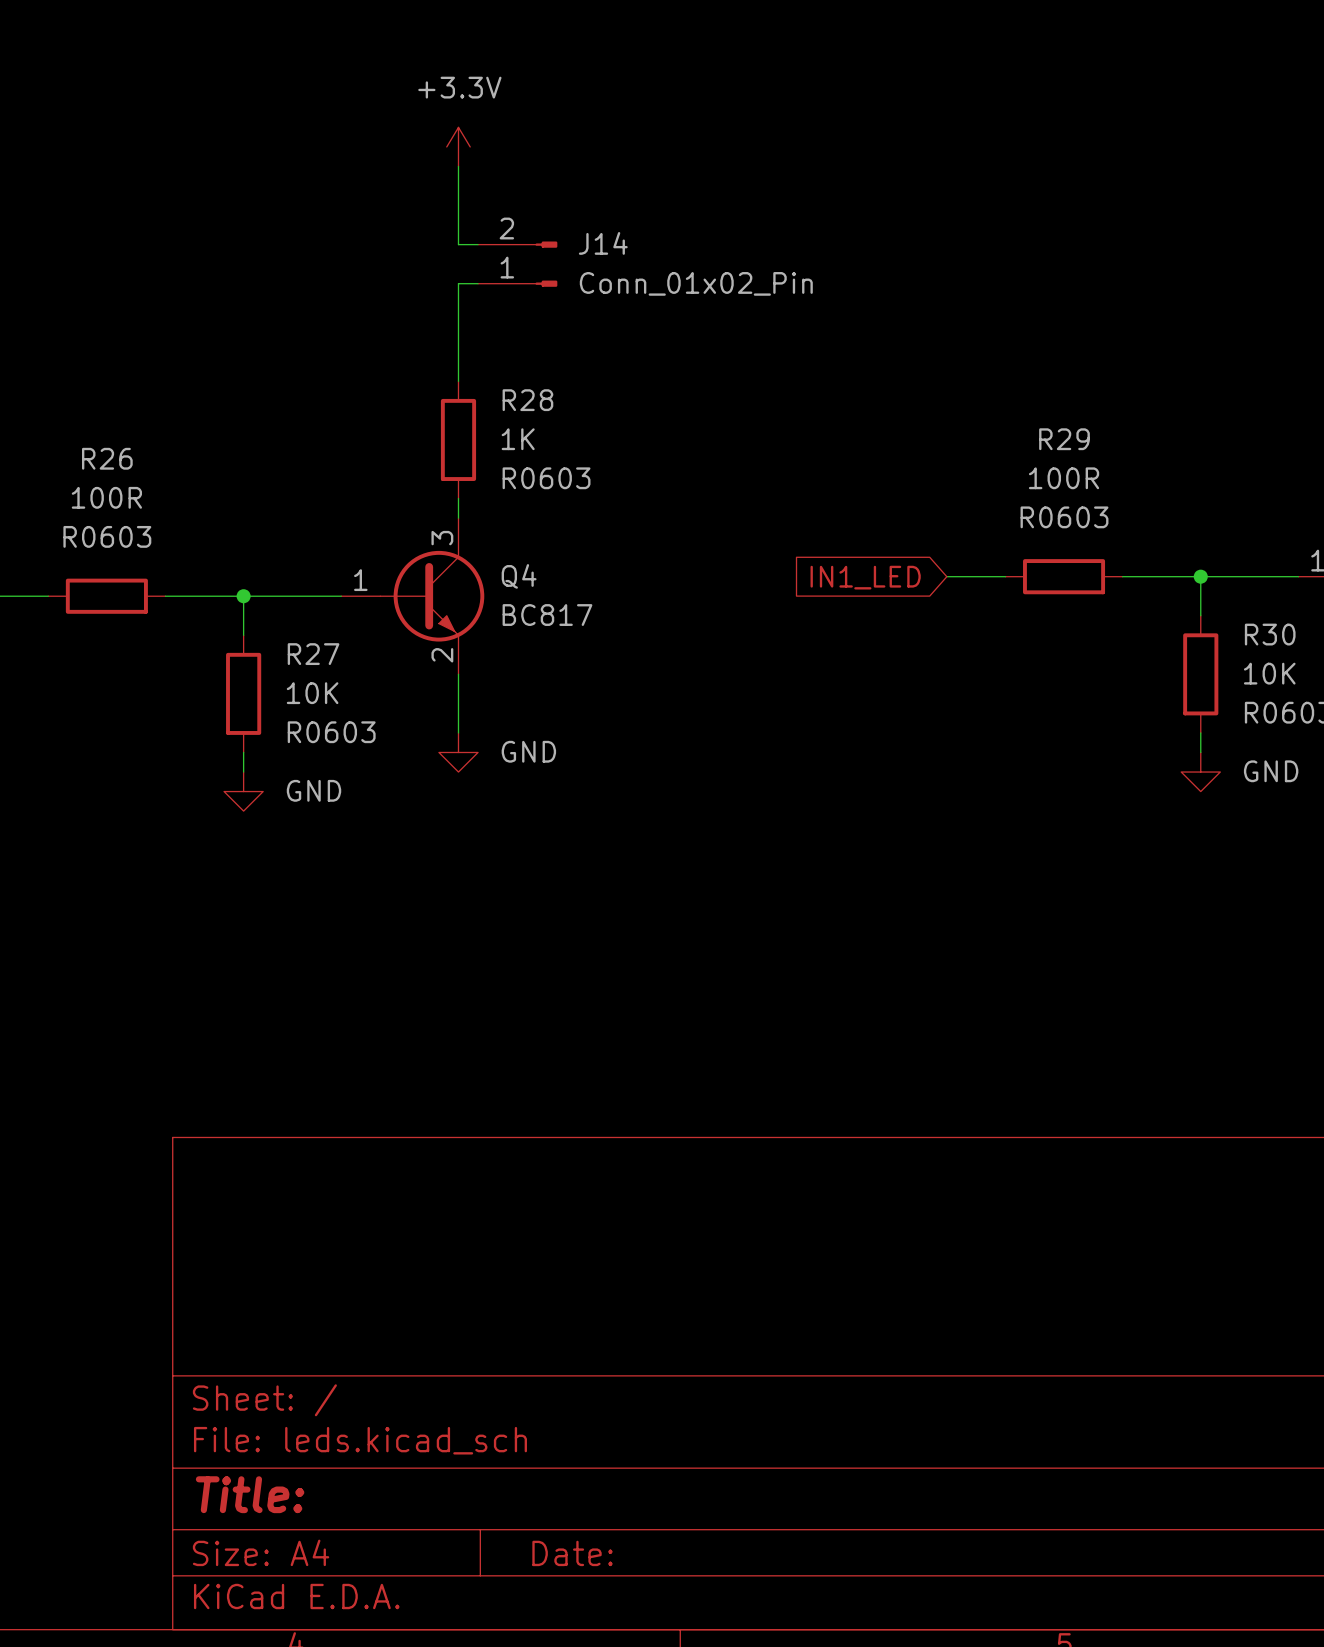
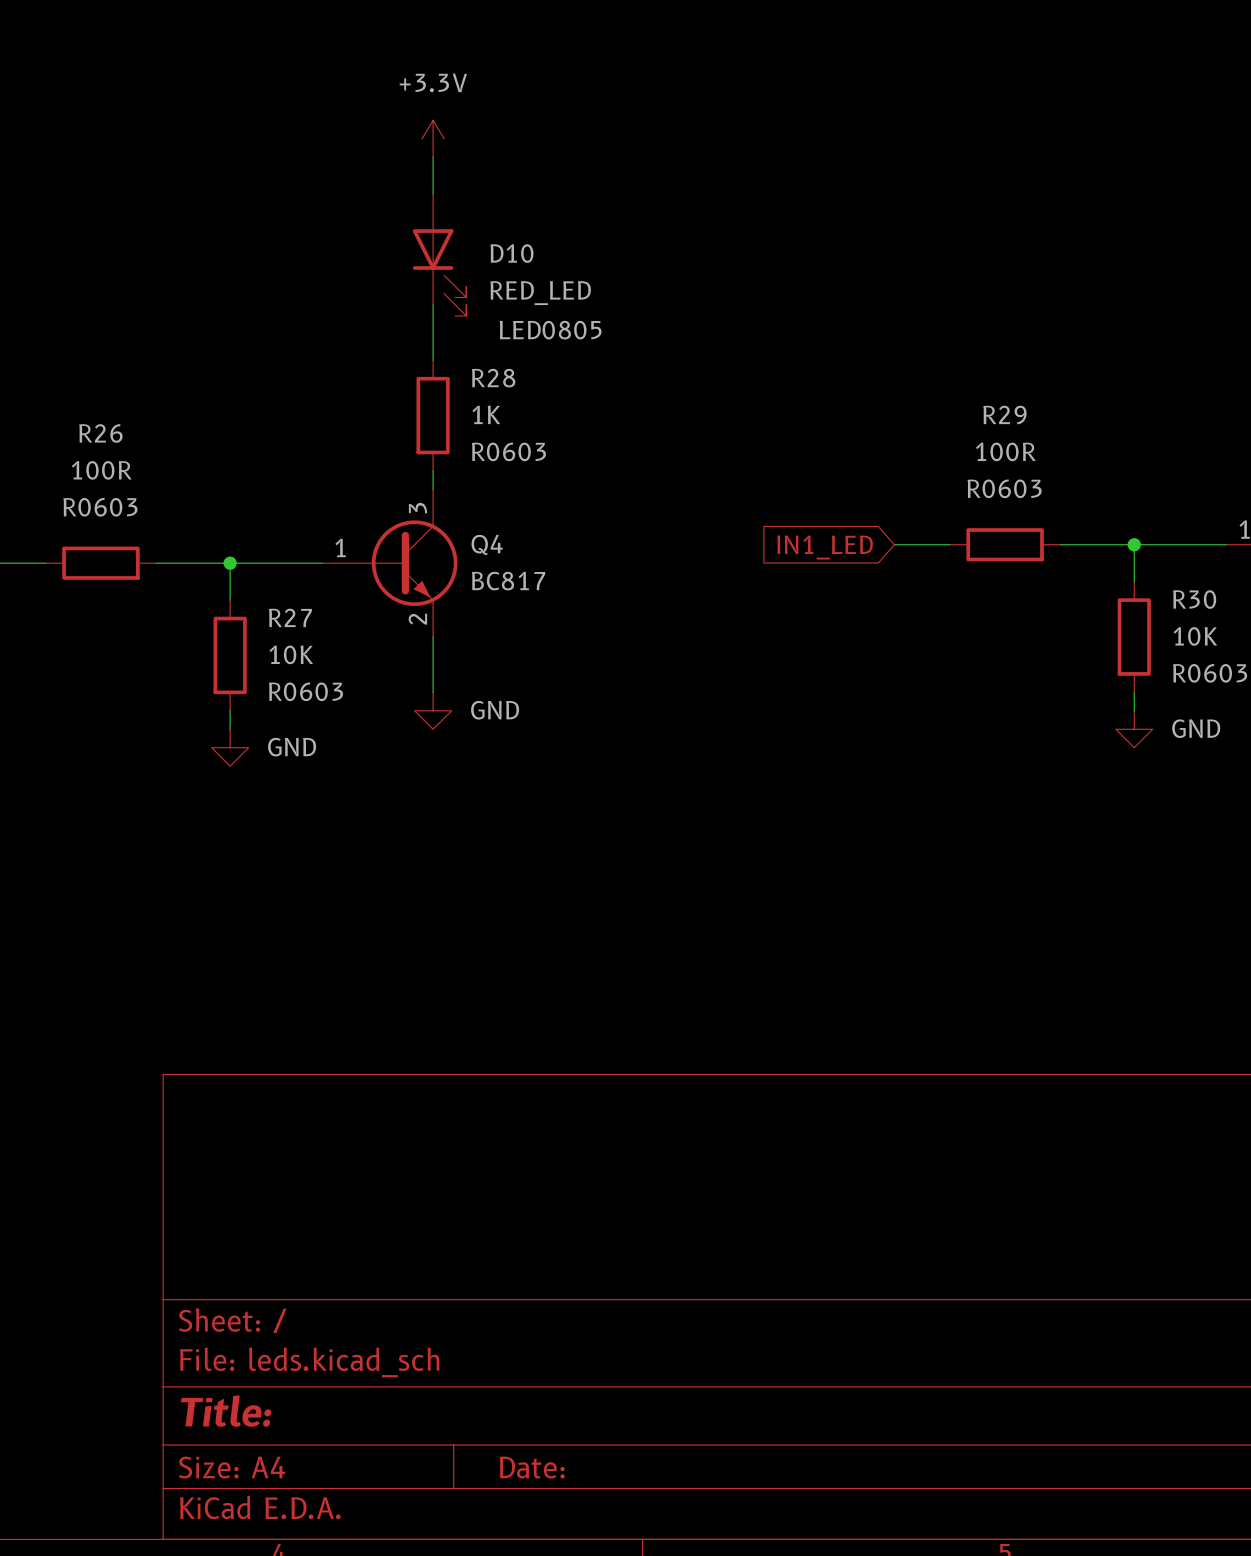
J14: Conn_01x02_Pin (517, 264) -> none
D10: none -> RED_LED (439, 255)

